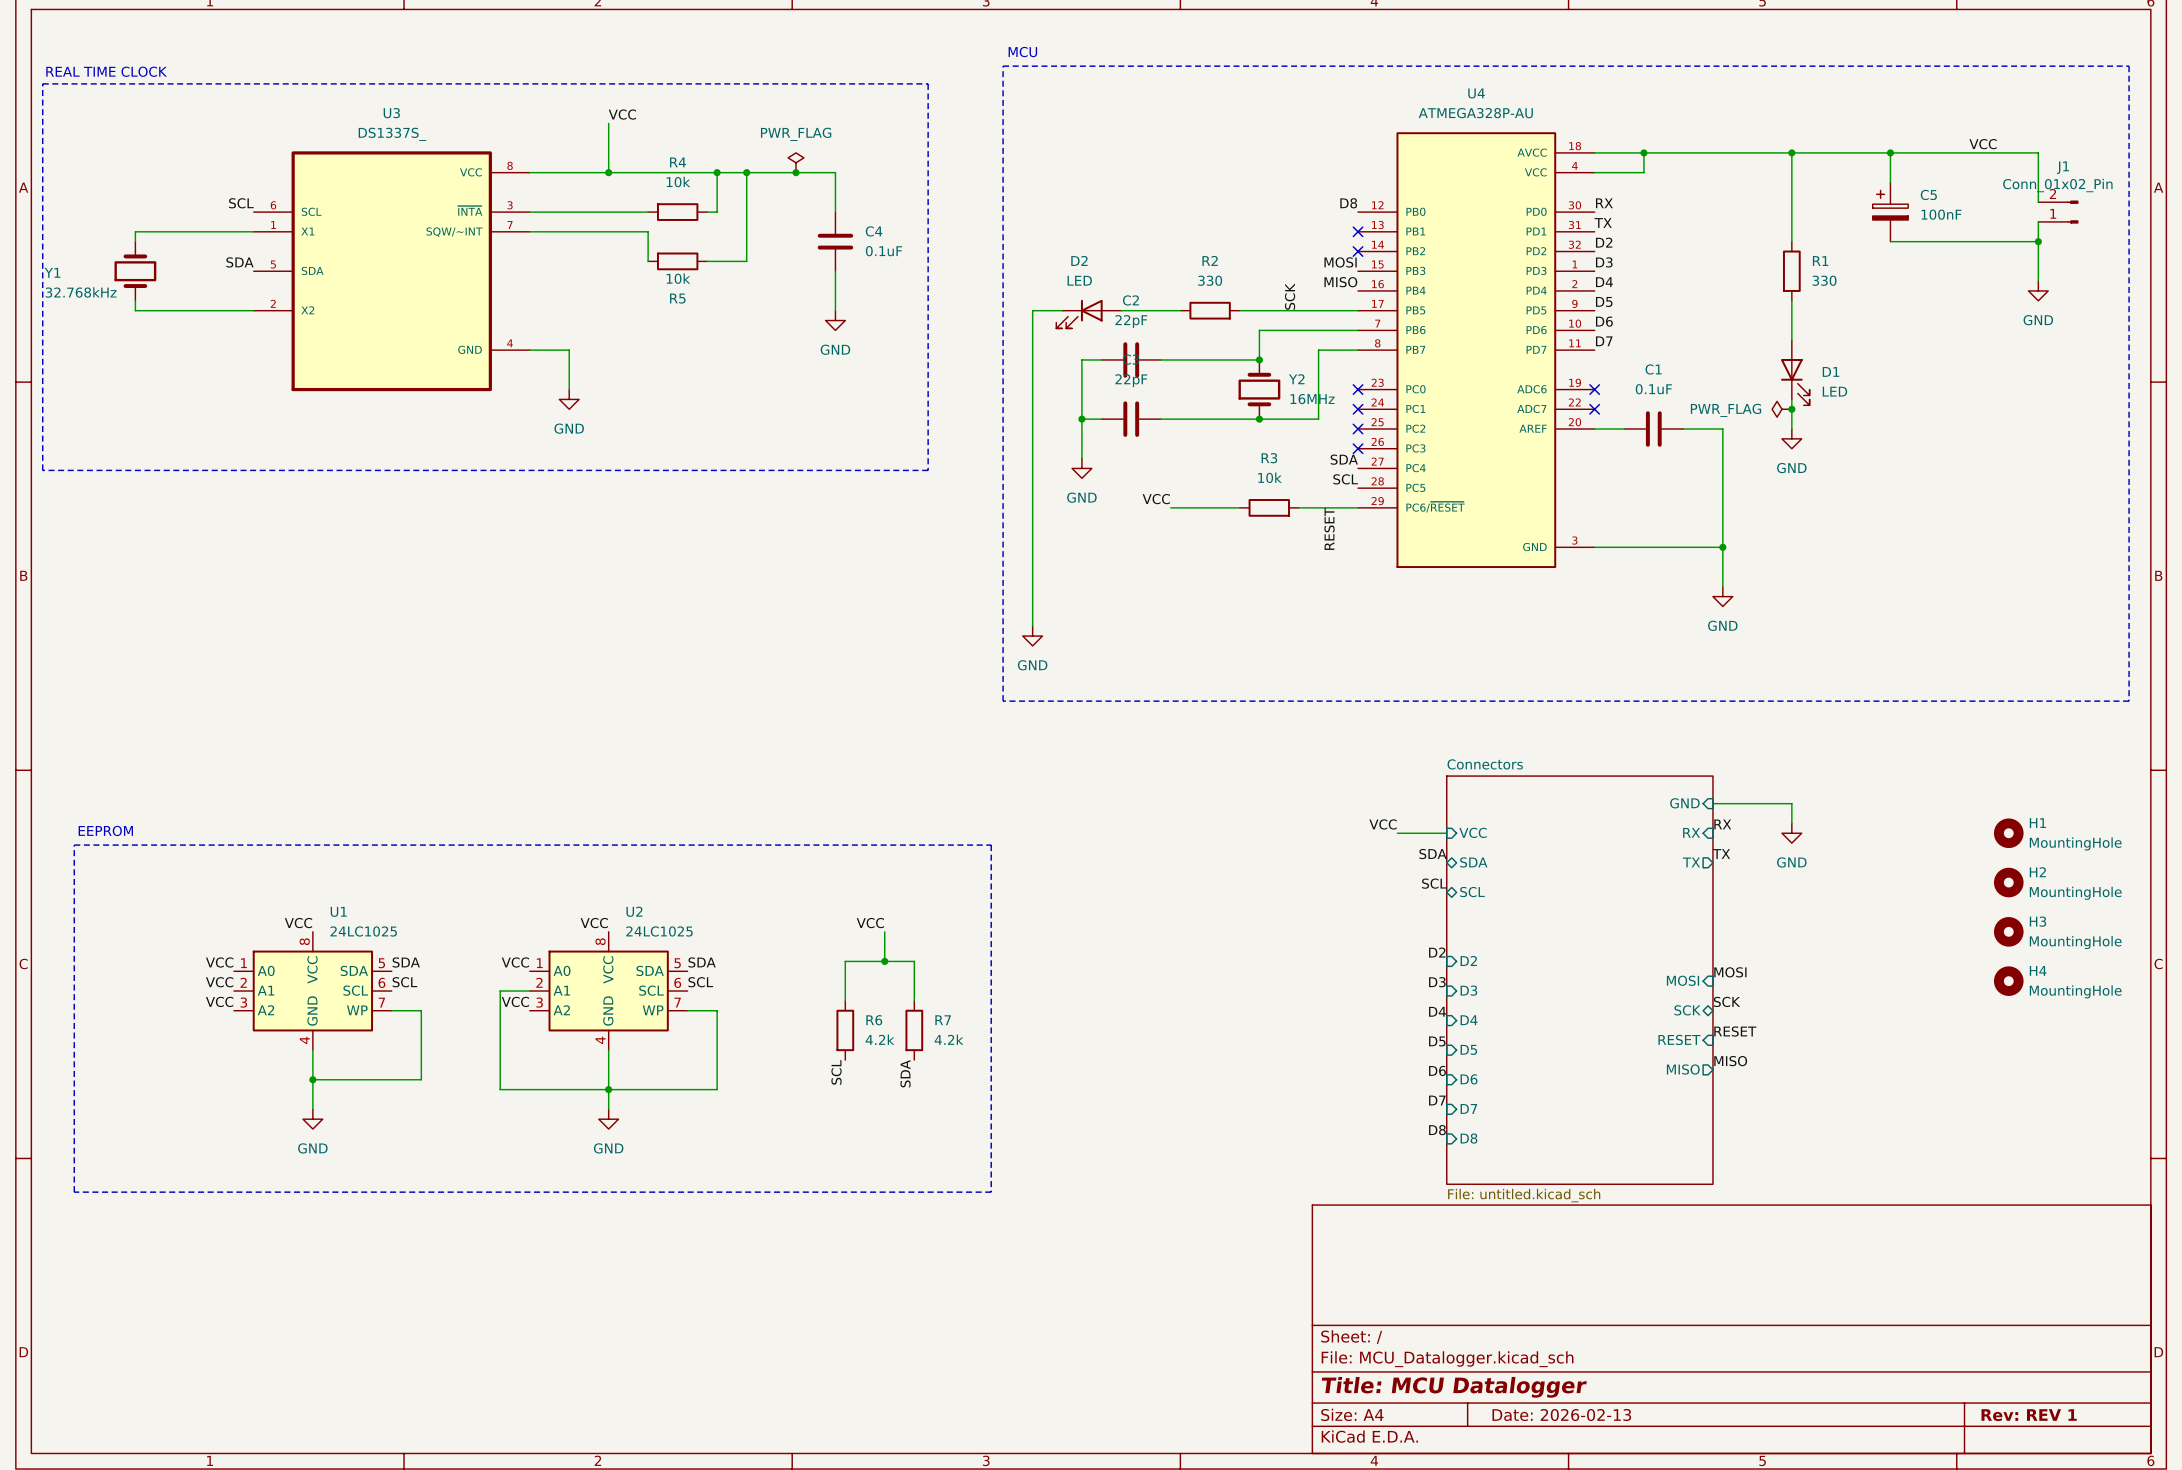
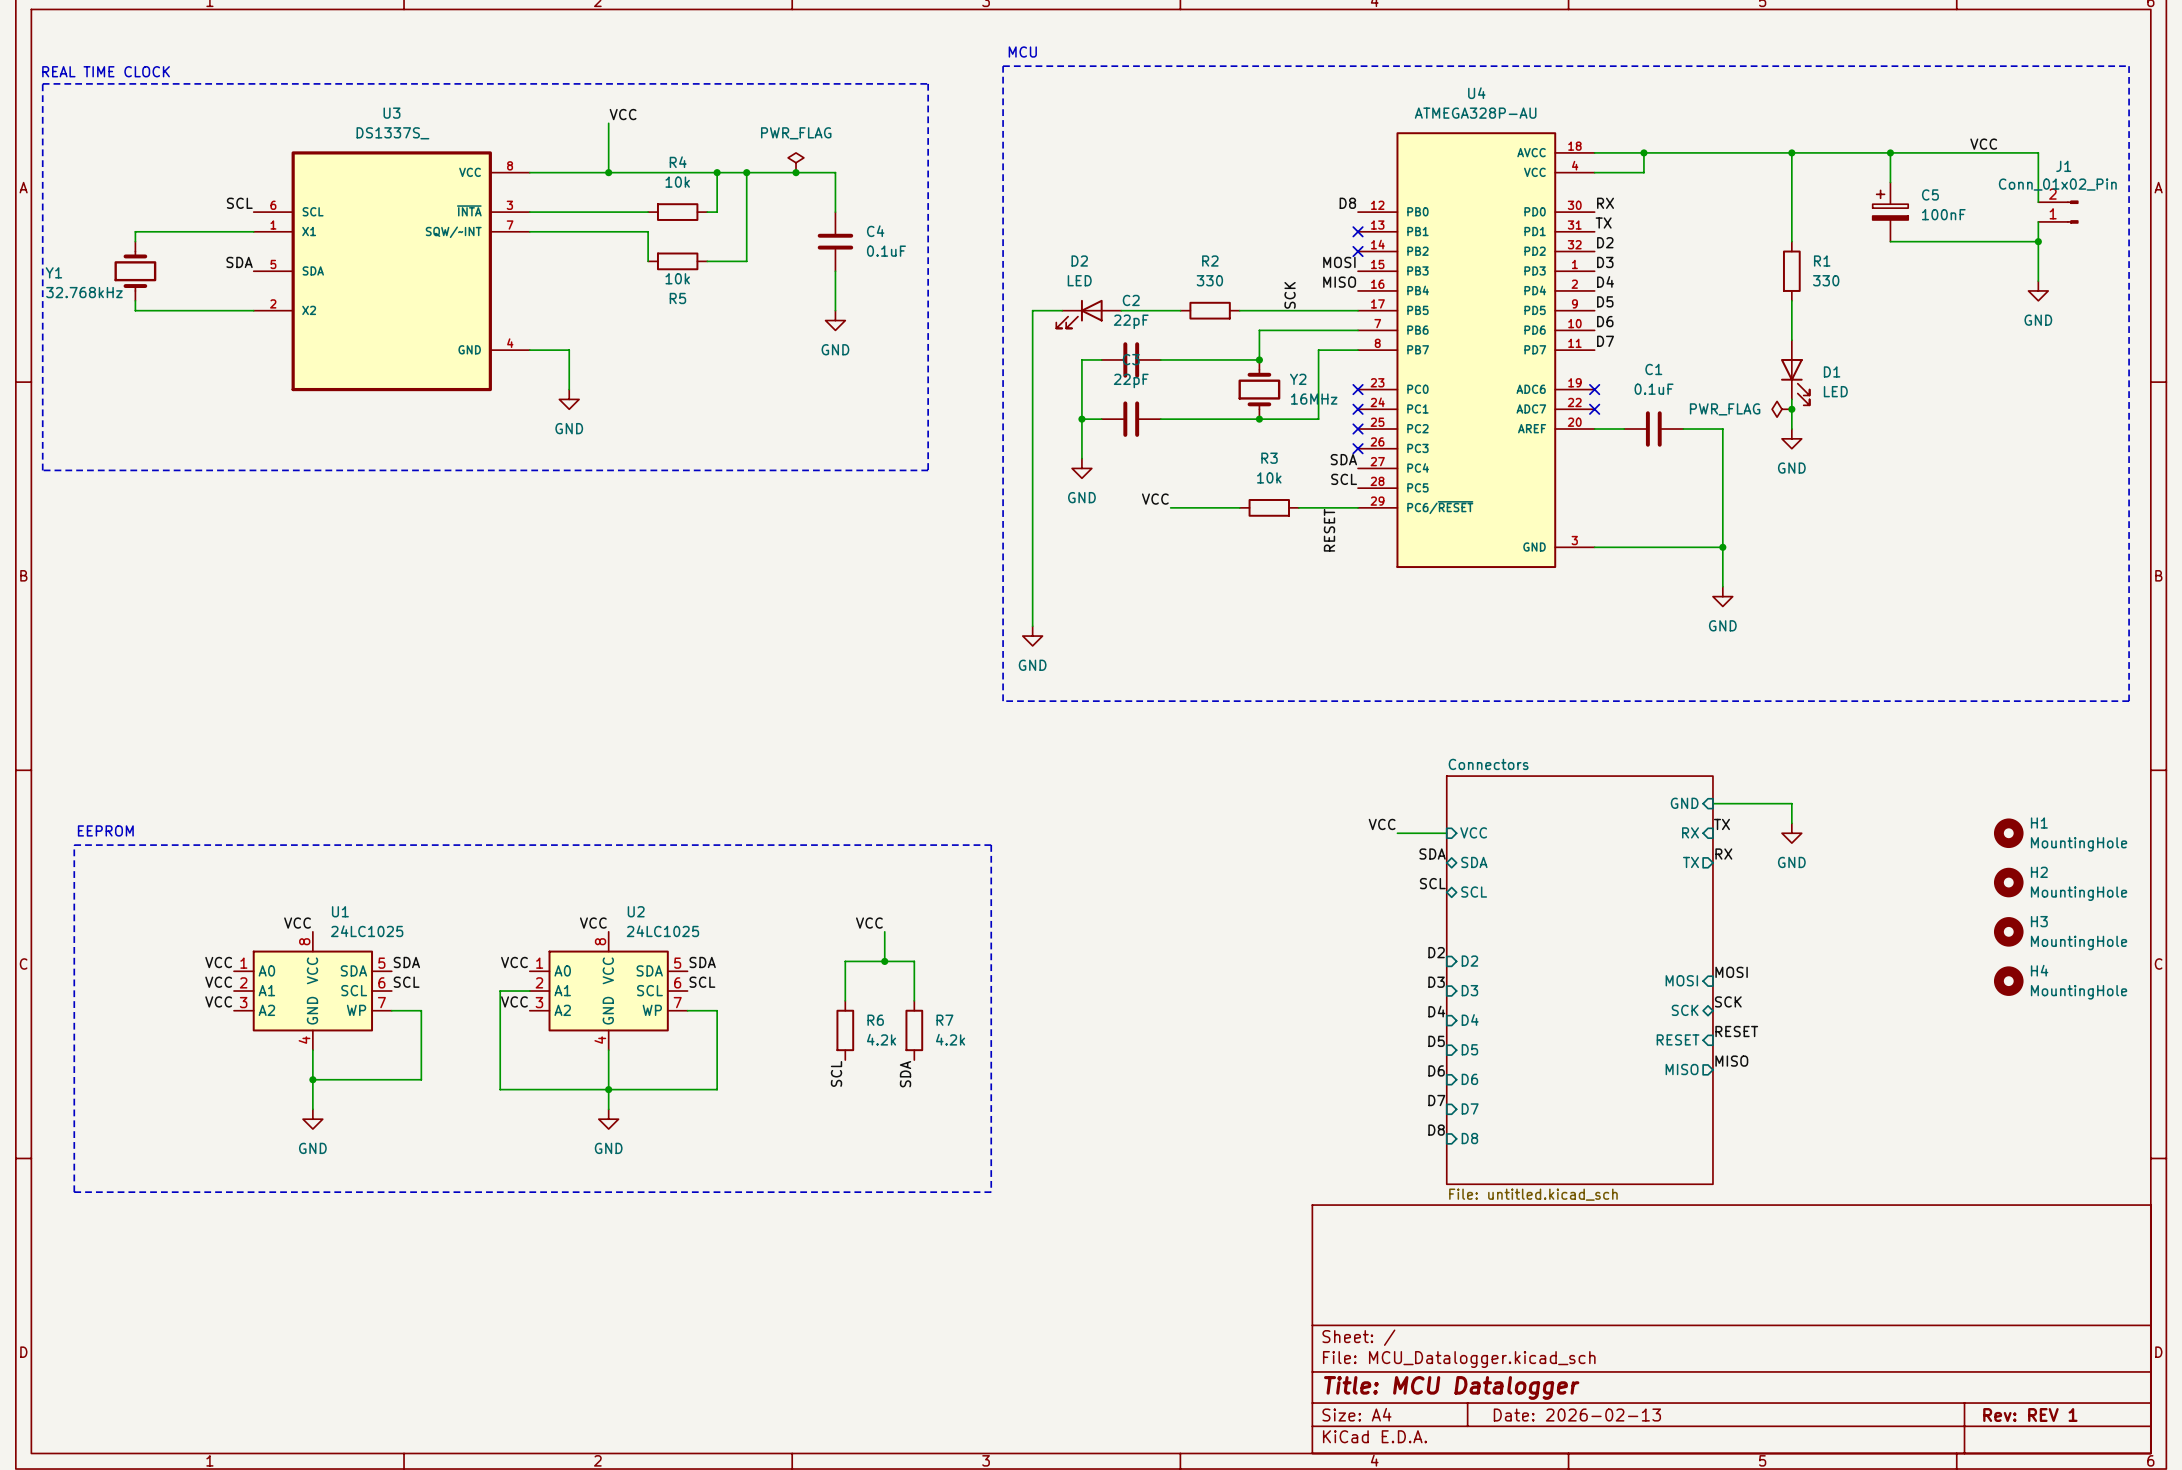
label: RX (1722, 824) -> TX (1721, 824)
label: TX (1721, 854) -> RX (1723, 854)

